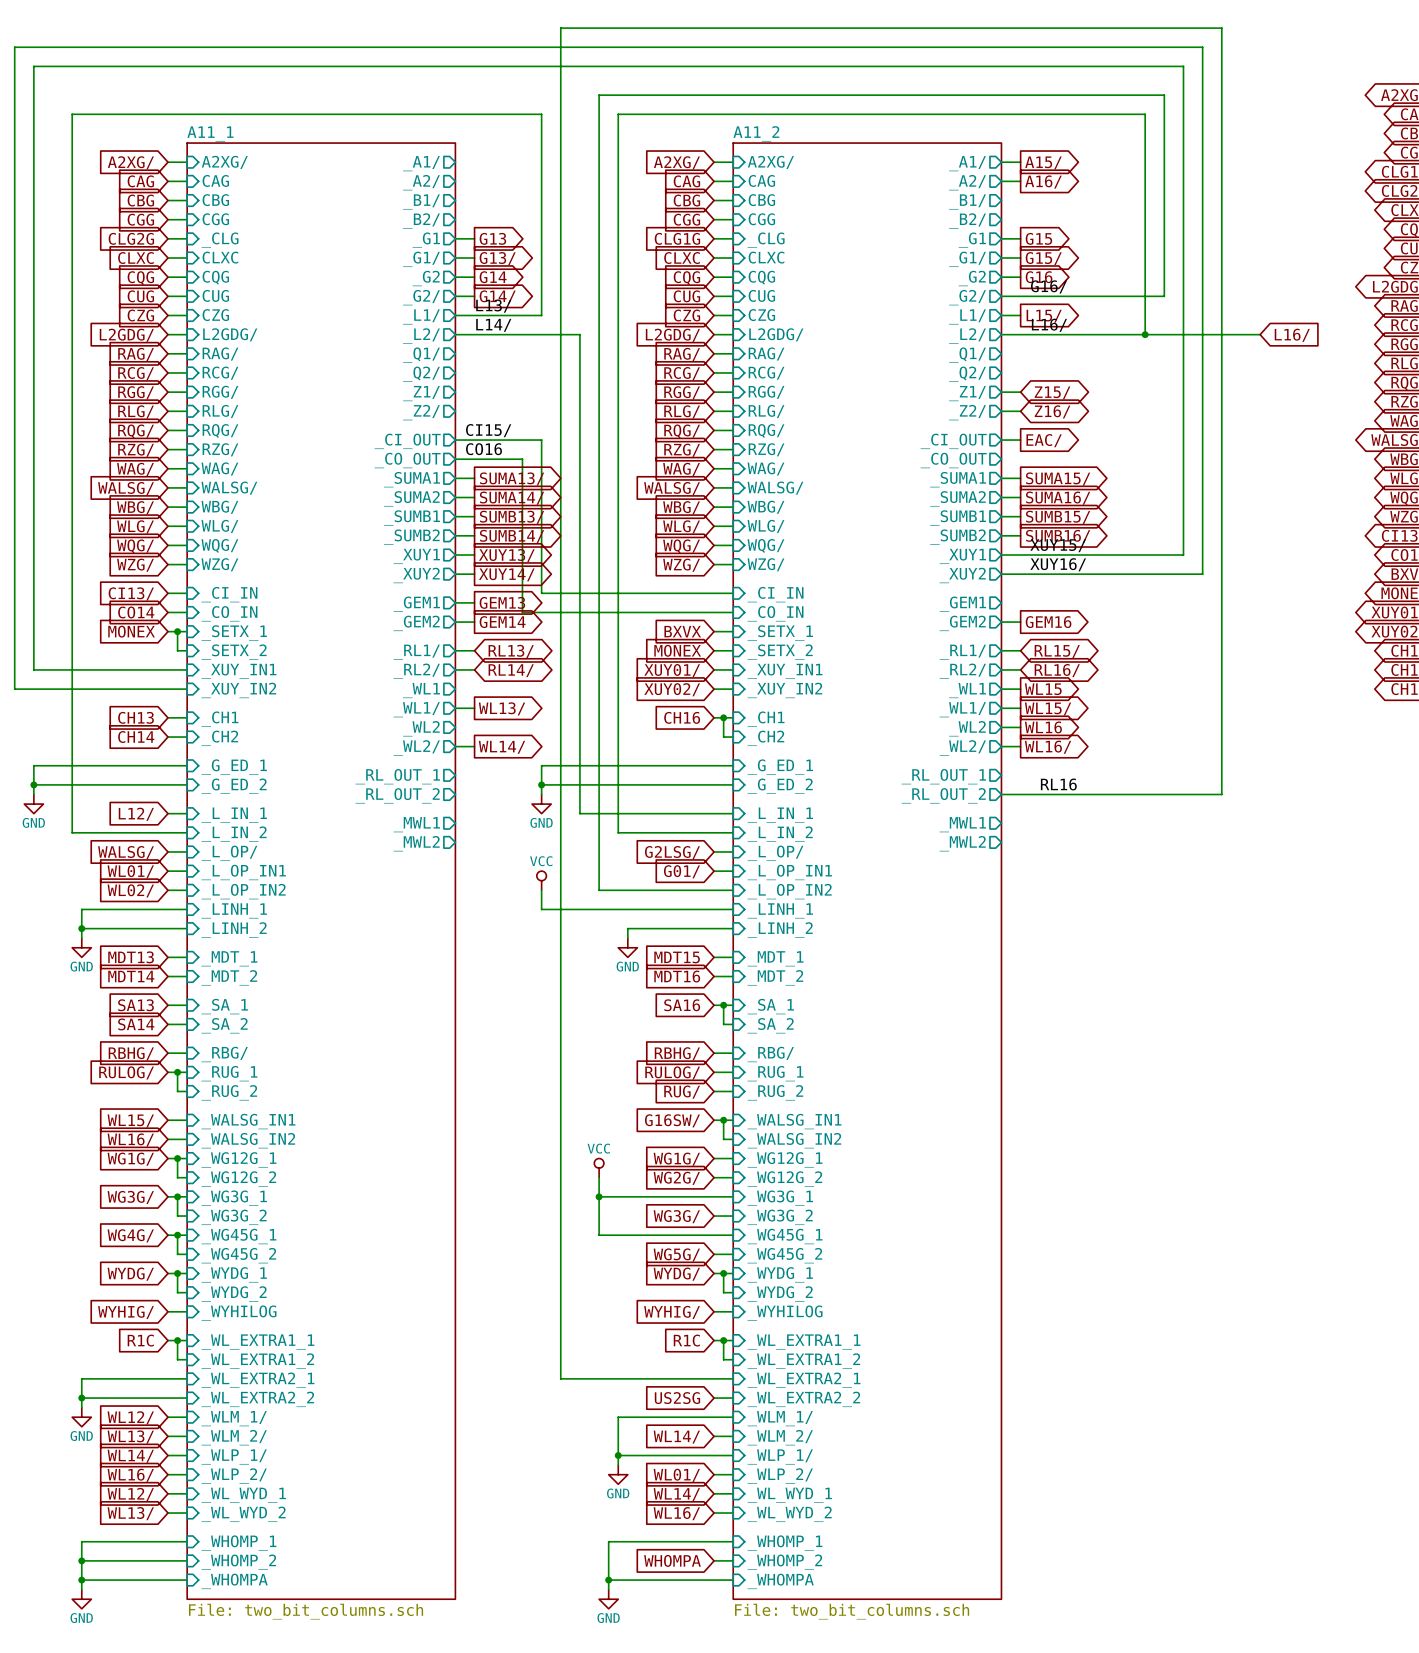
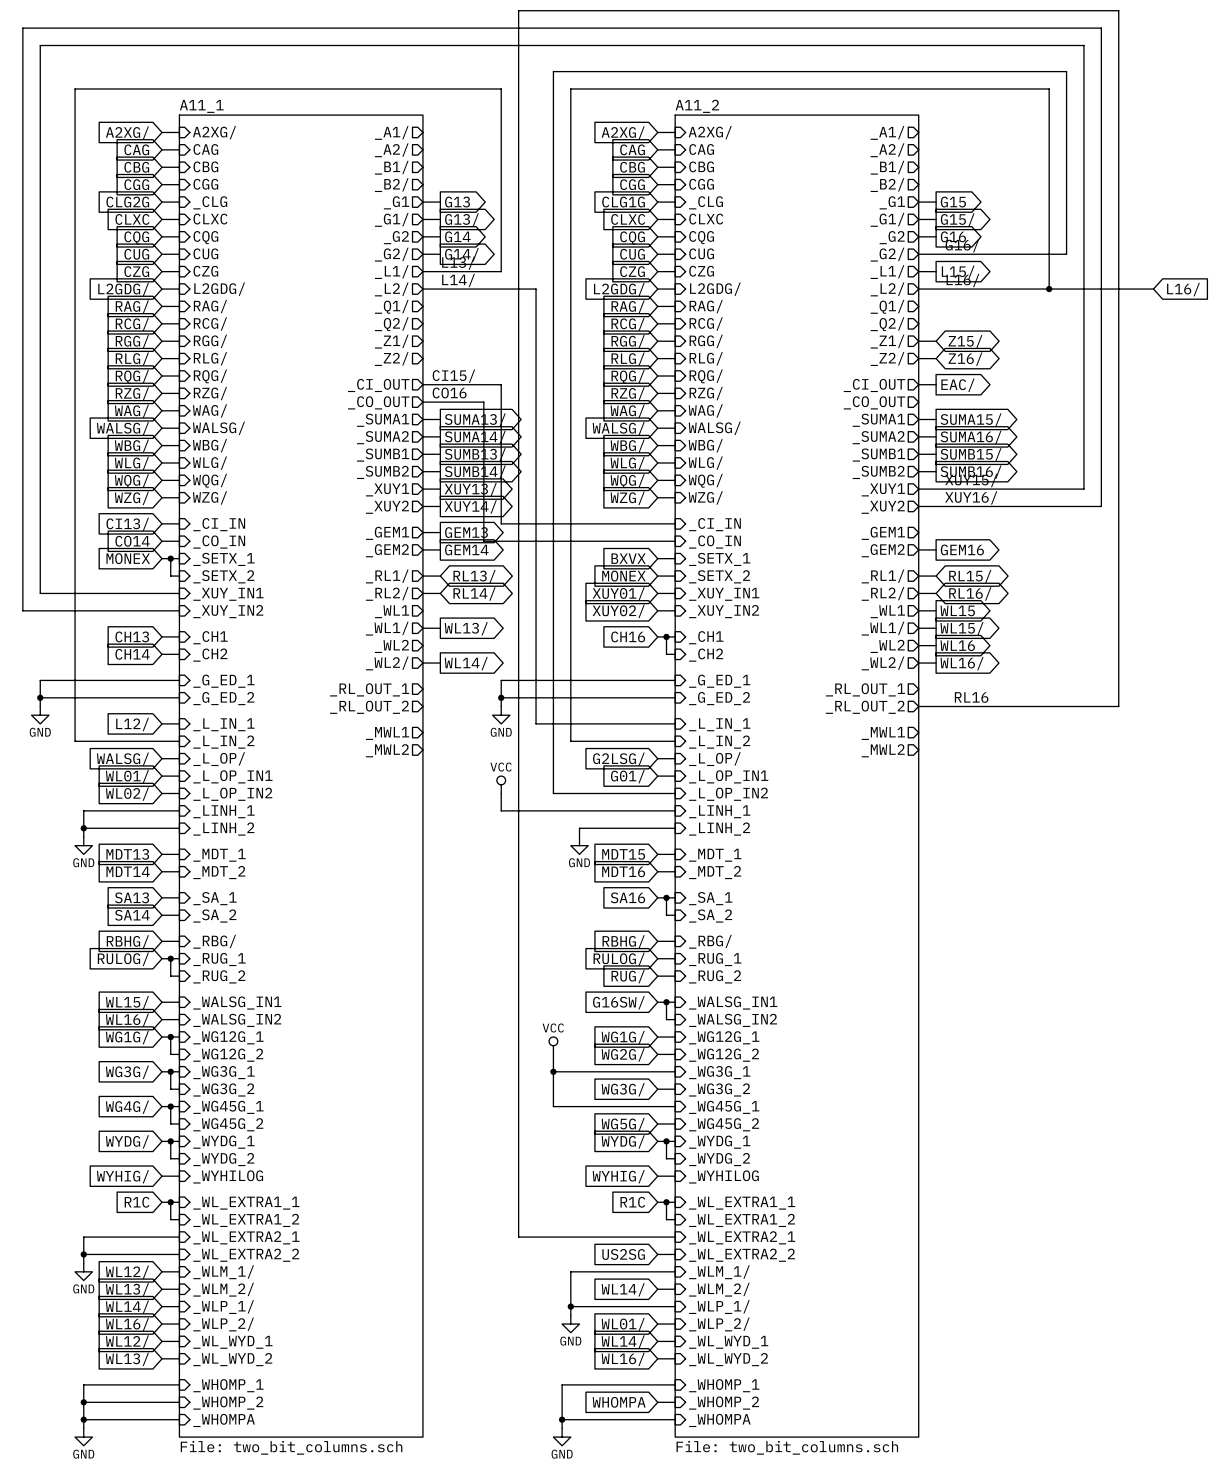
wire: (1001, 162) (1020, 162) -> none
global label: A15/ (1043, 162) -> none
wire: (1001, 181) (1020, 181) -> none
global label: A16/ (1043, 182) -> none

